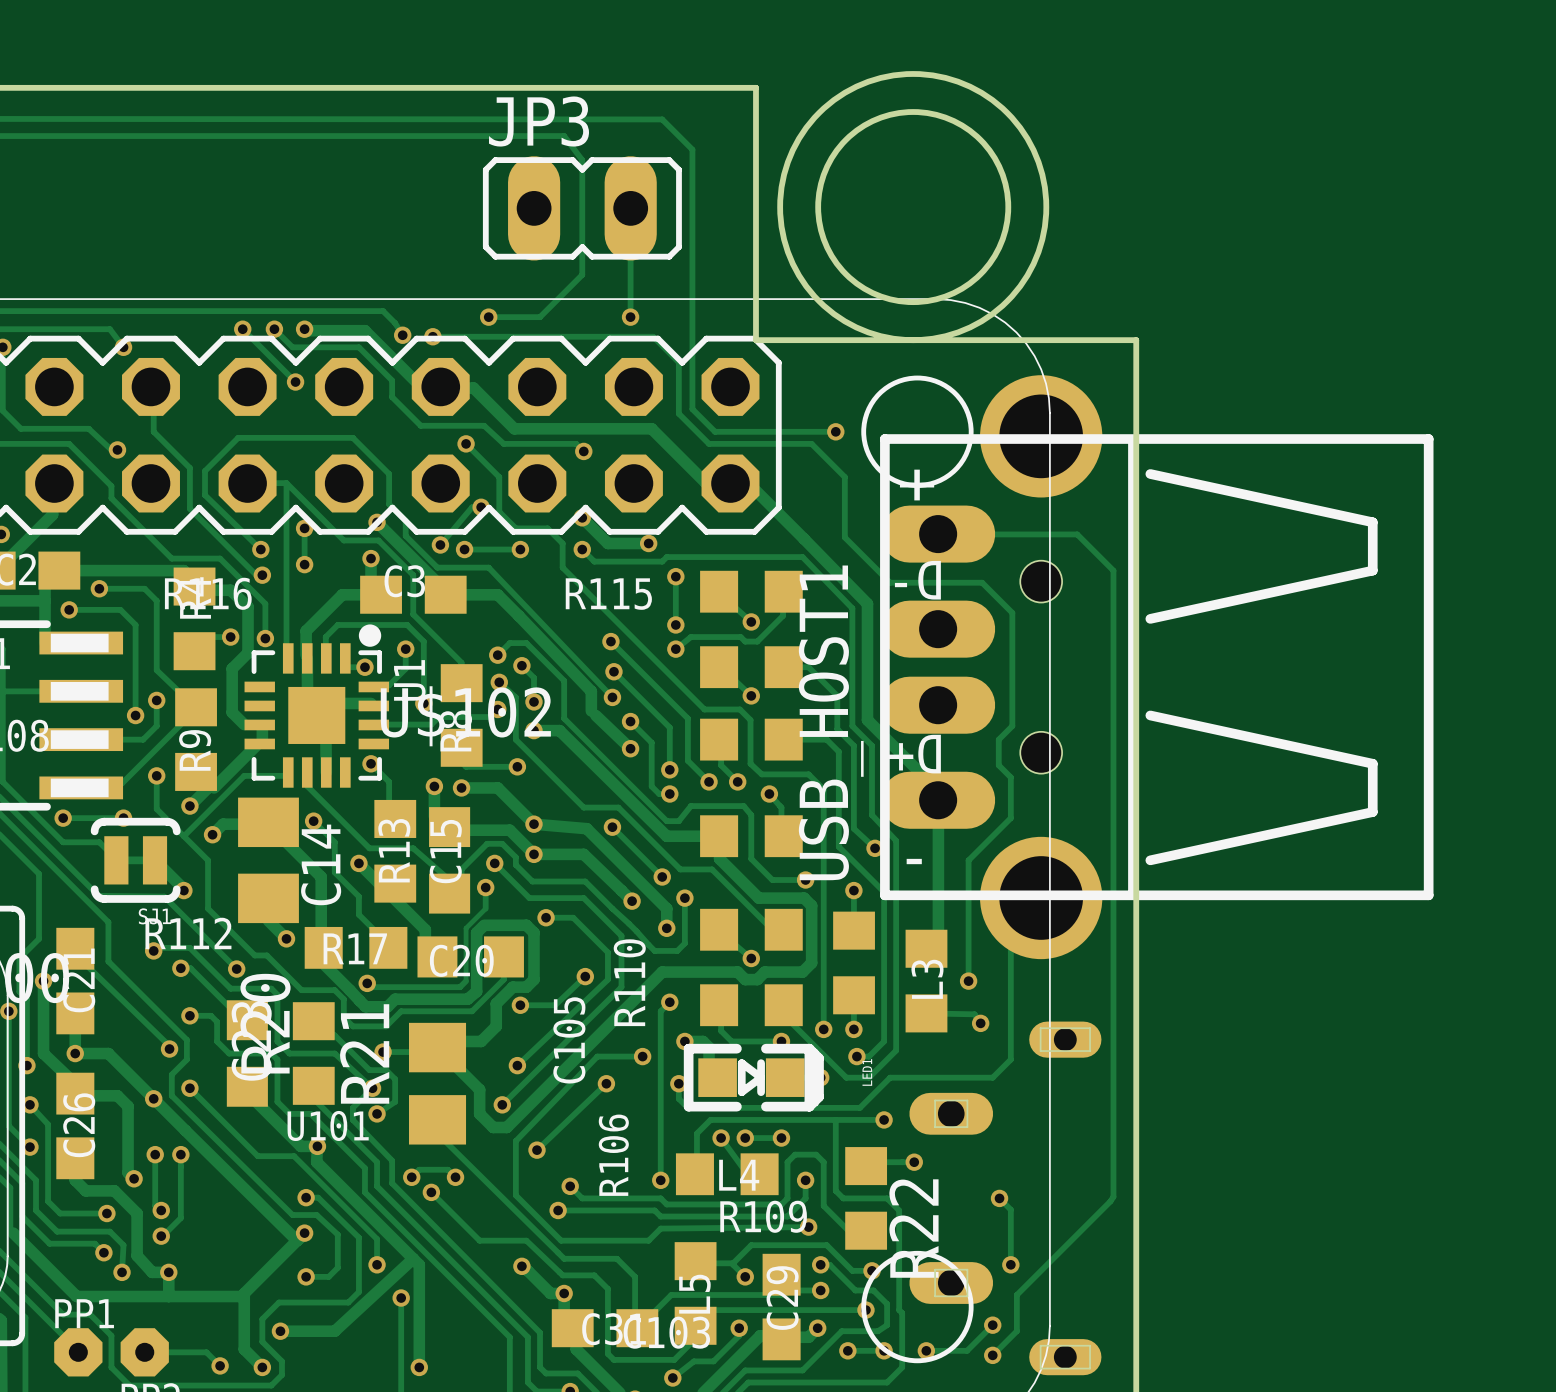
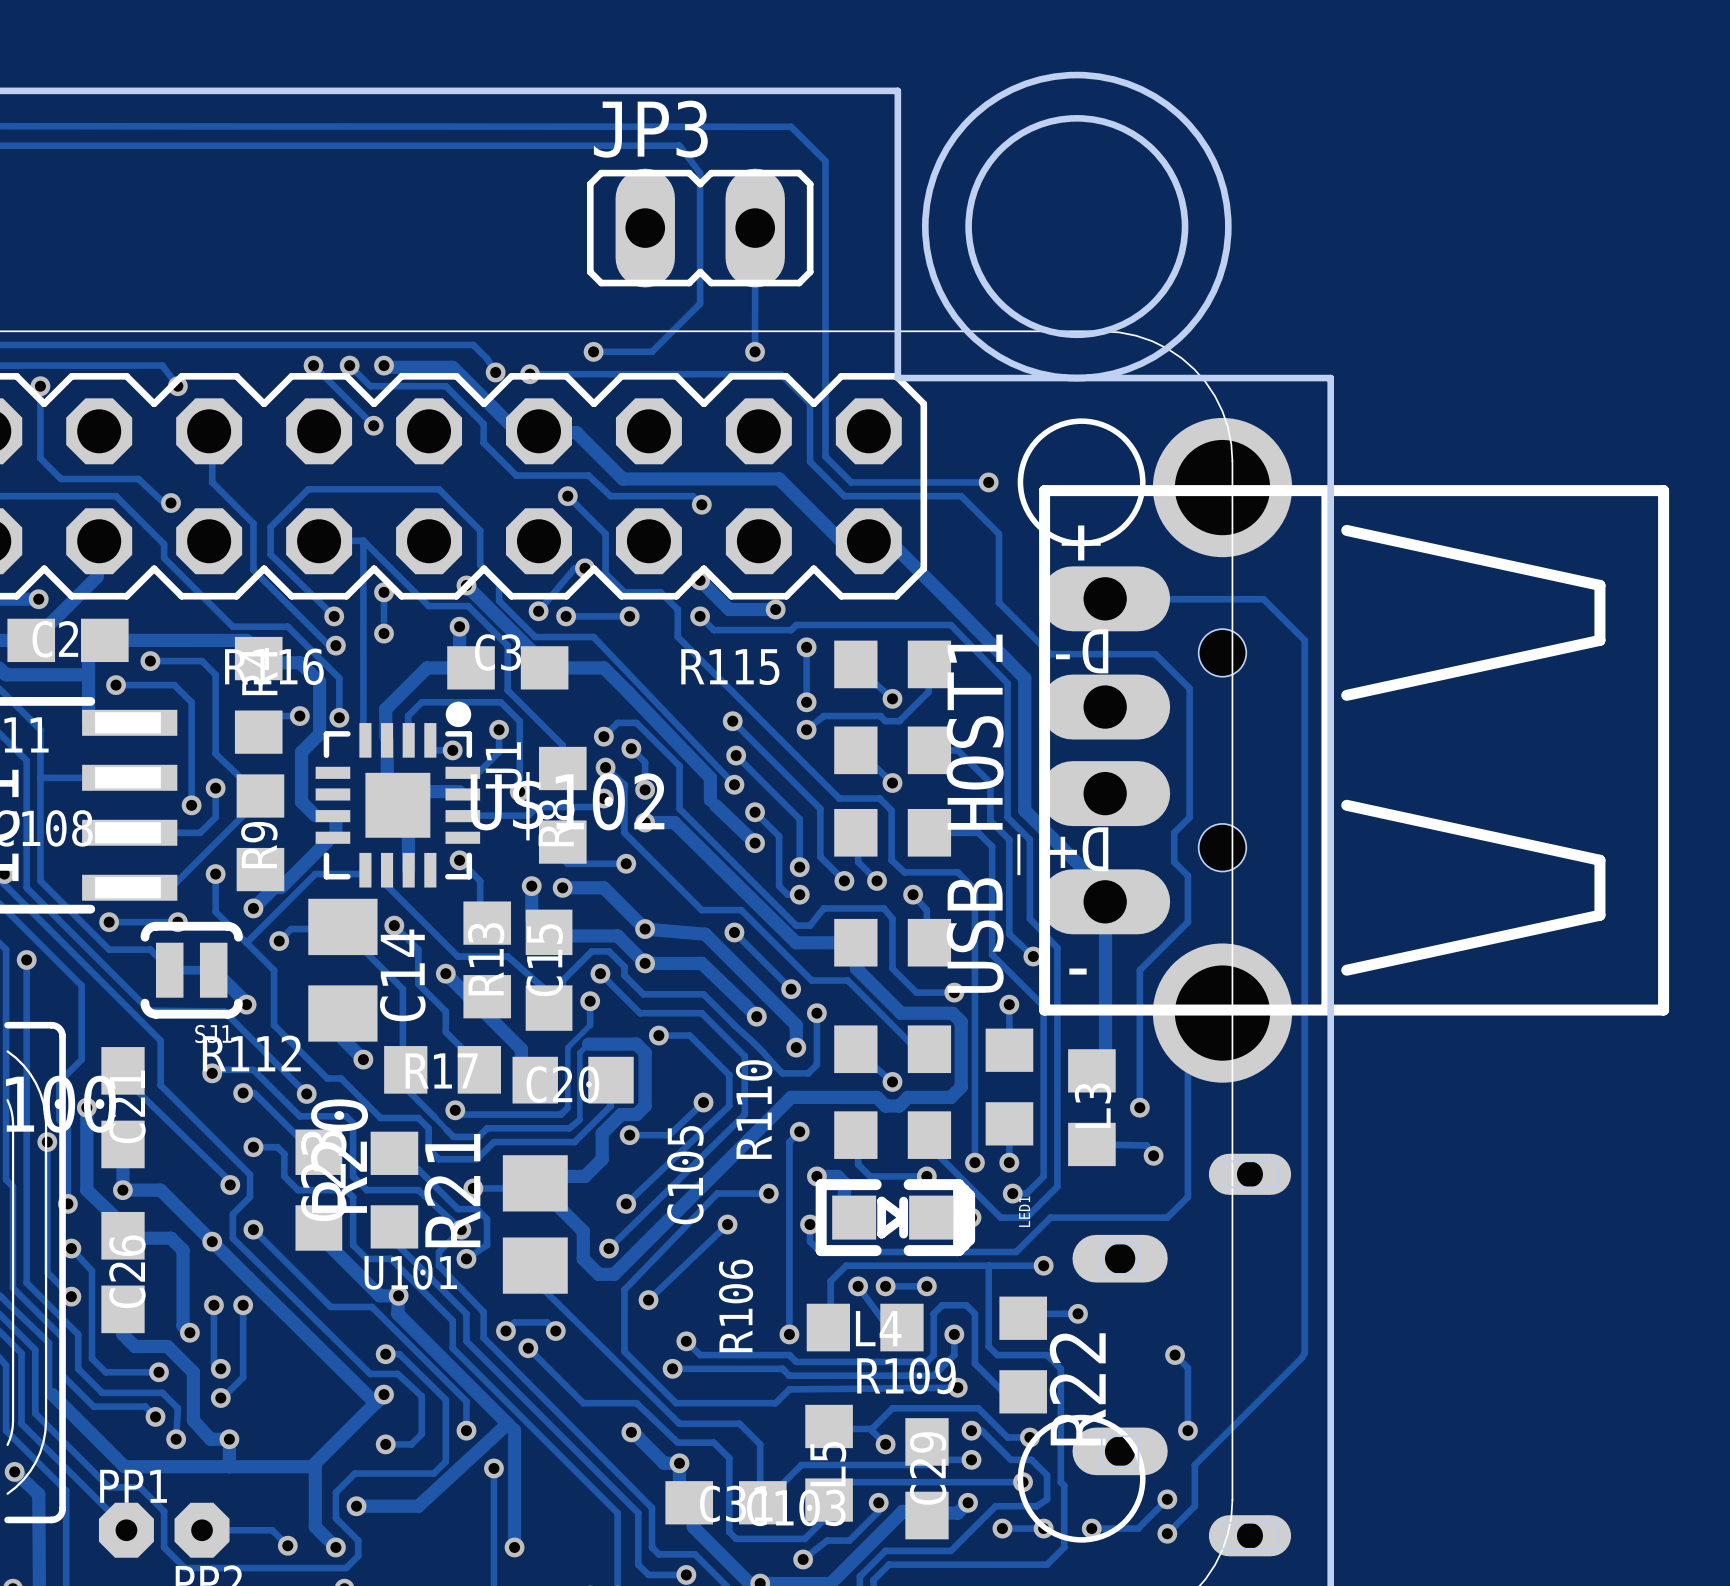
track width: thick (212, 834) (223, 824) (268, 824) (321, 876) (321, 961) (365, 1006) (387, 1006) (395, 999) (467, 999) (476, 991) (476, 932) (482, 926) -> thin (279, 941) (291, 929) (342, 929) (402, 989) (402, 1085) (453, 1136) (478, 1136) (487, 1128) (569, 1128) (579, 1119) (579, 1052) (586, 1045)

